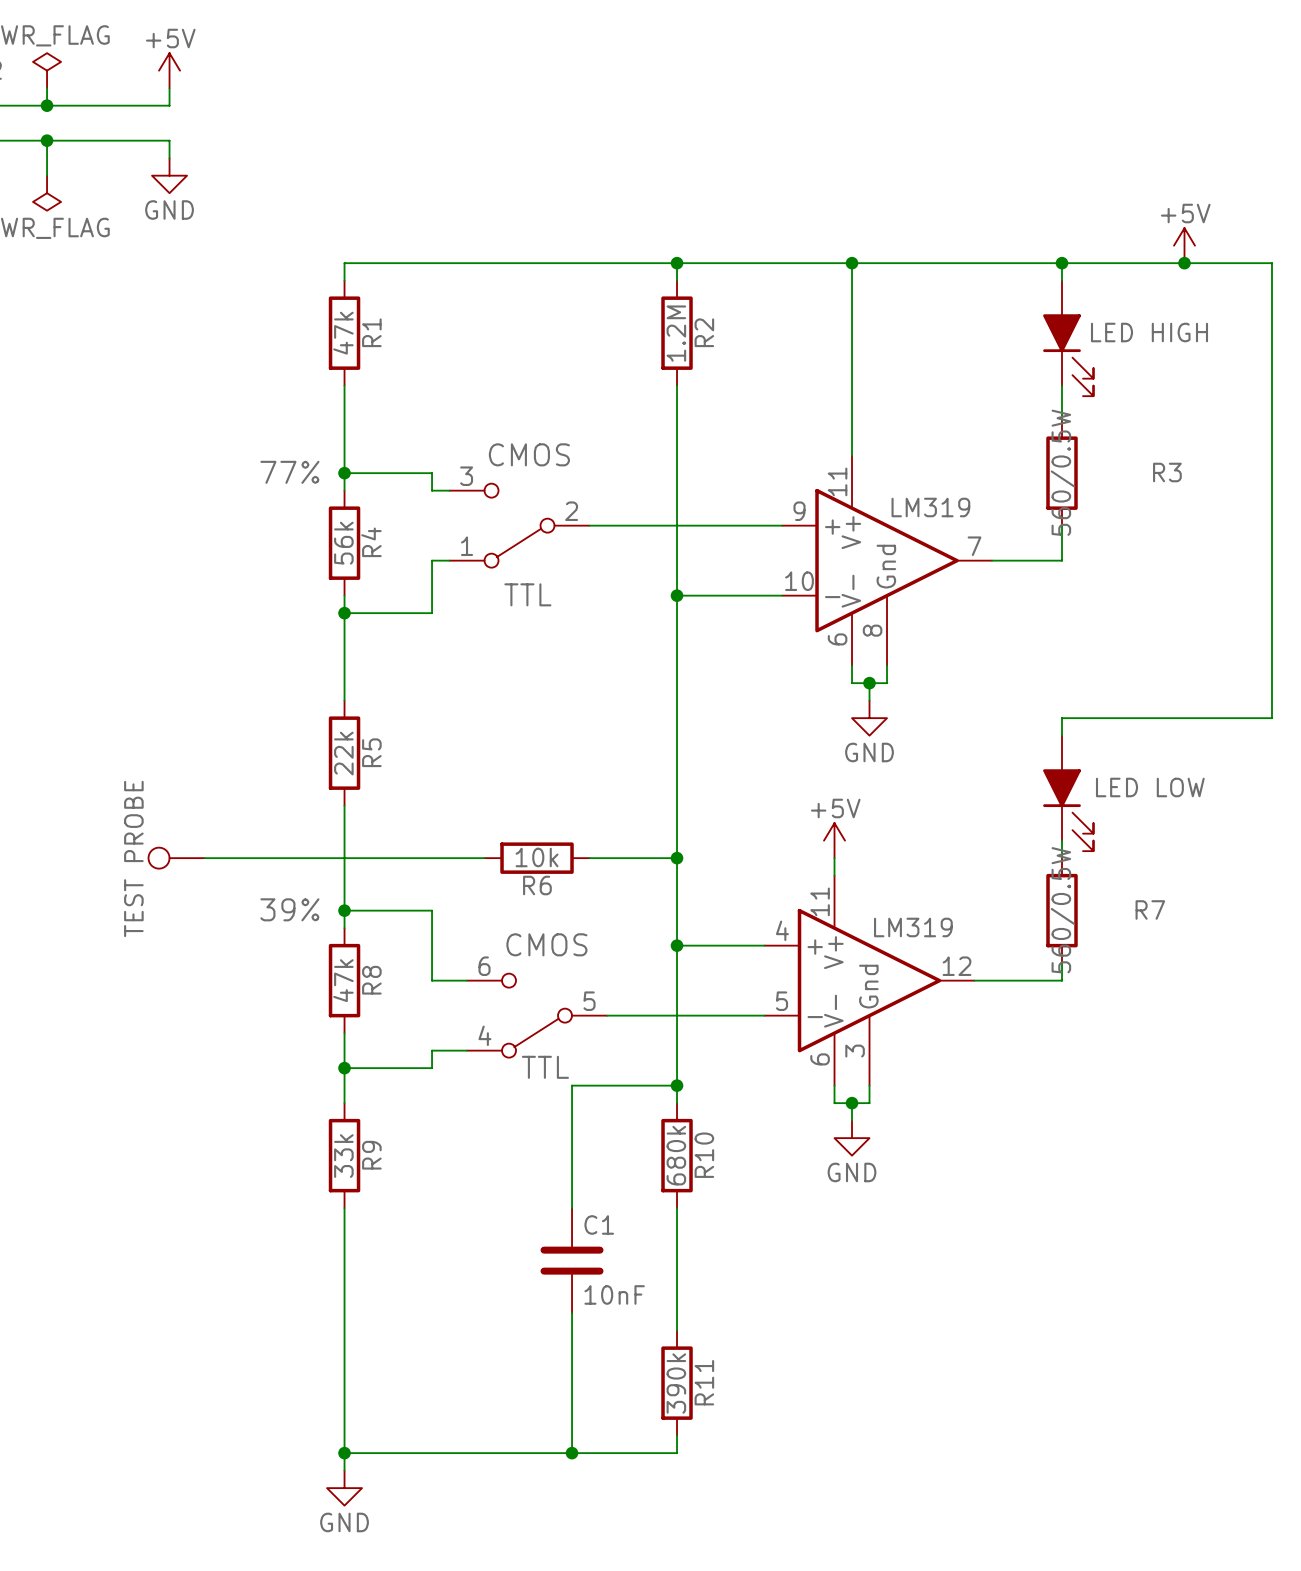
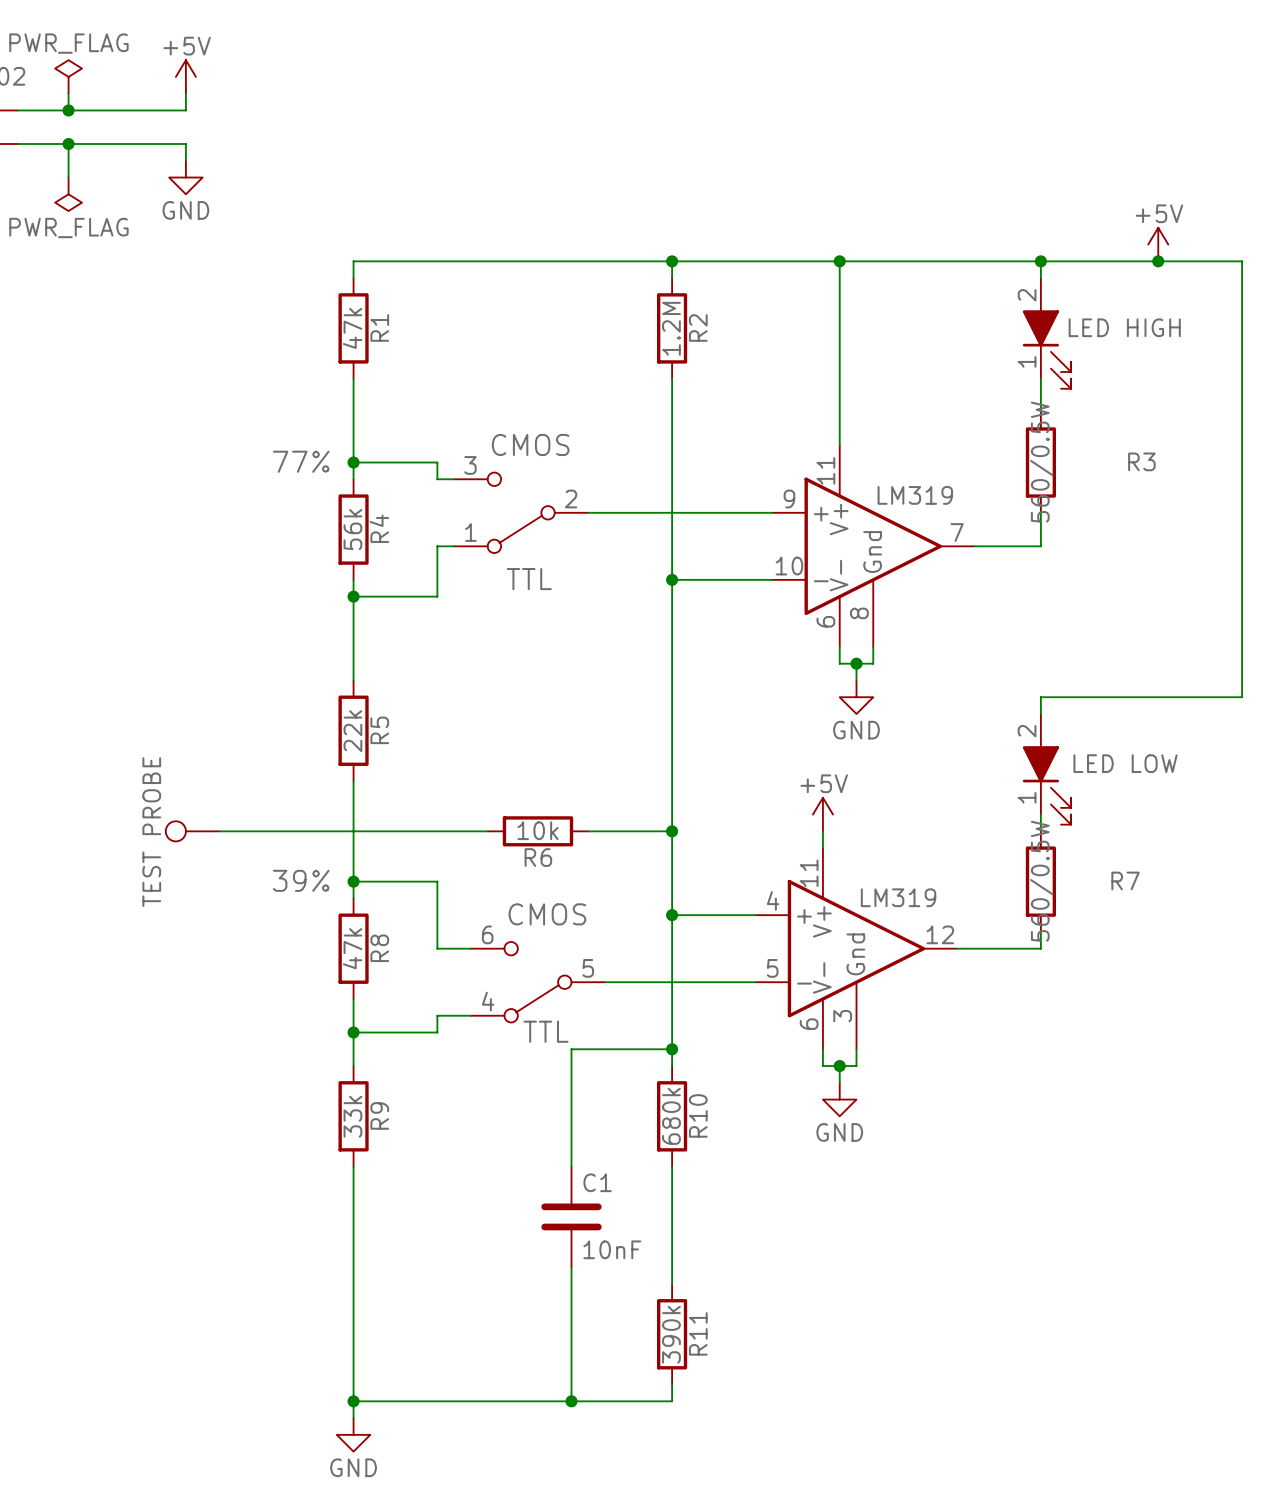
part pin number: none -> 2 (1027, 295)
part pin number: none -> 1 (1027, 361)
part pin number: none -> 2 (1027, 731)
part pin number: none -> 1 (1027, 797)

